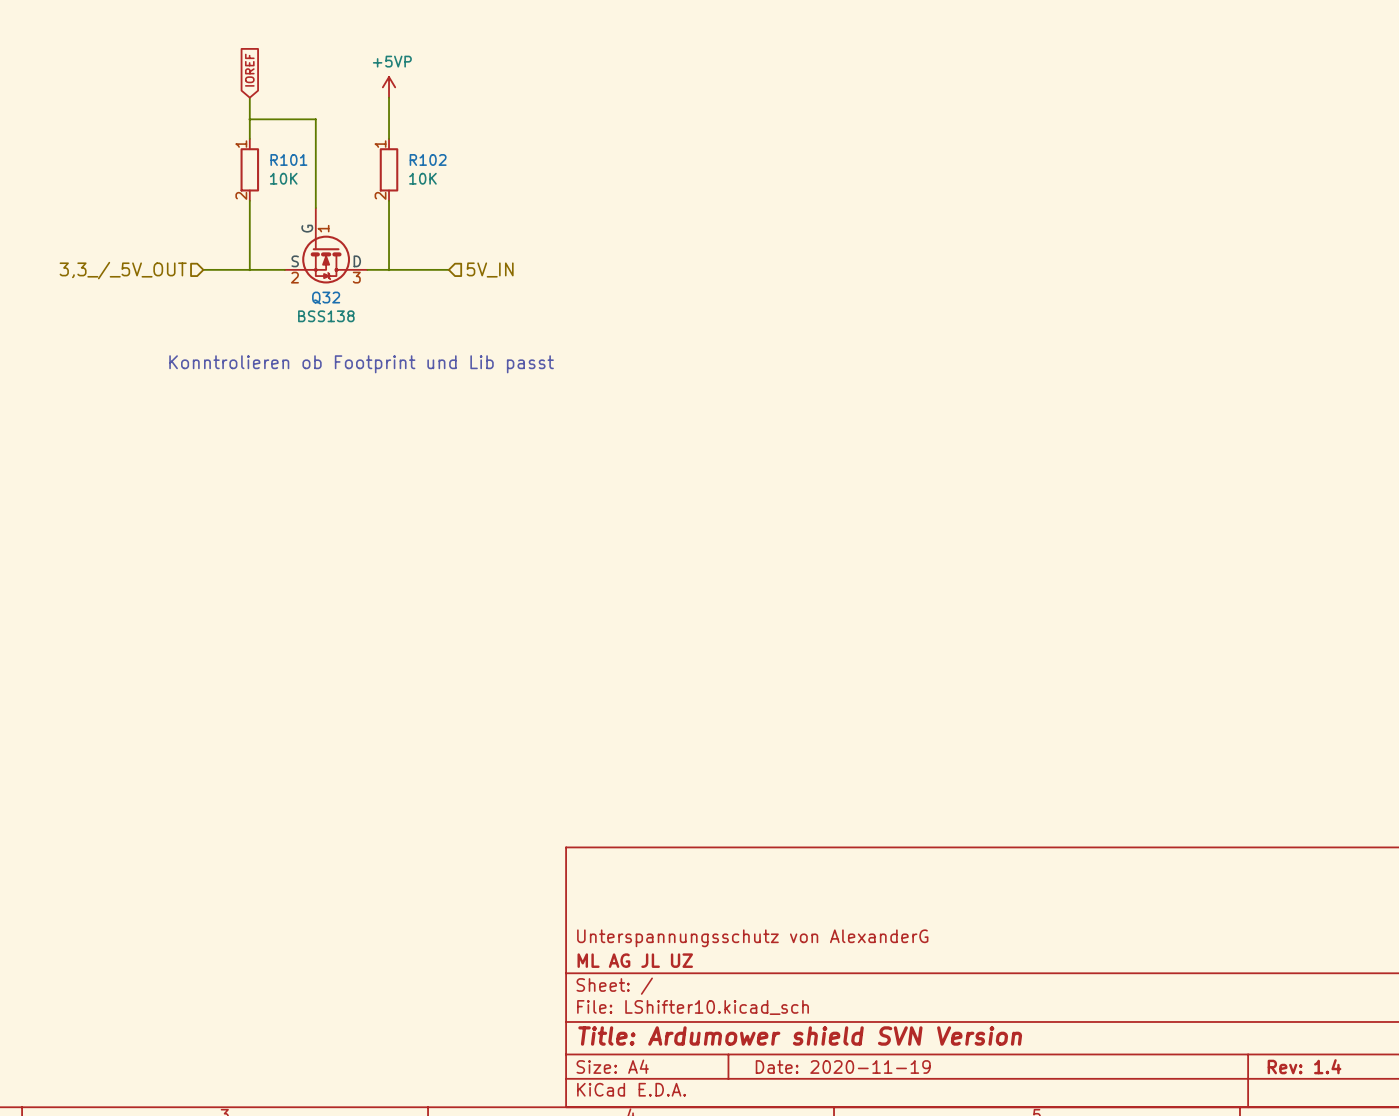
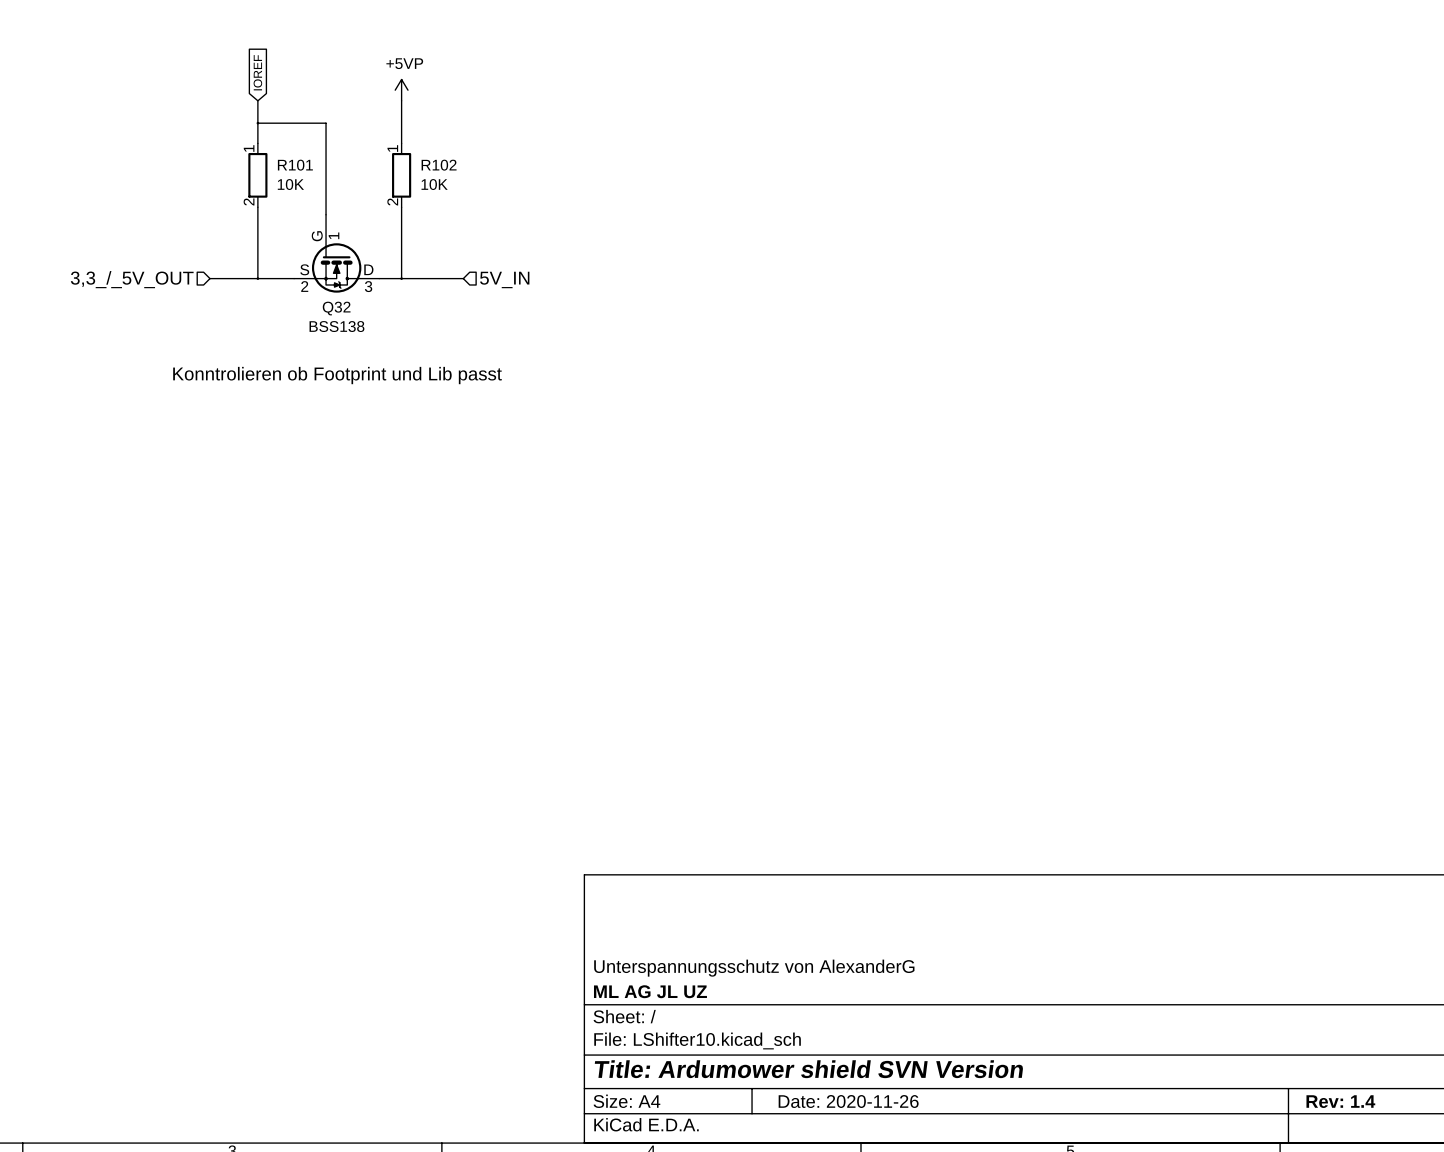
title block: Date: 2020-11-19 (843, 1067) -> Date: 2020-11-26 (848, 1101)

